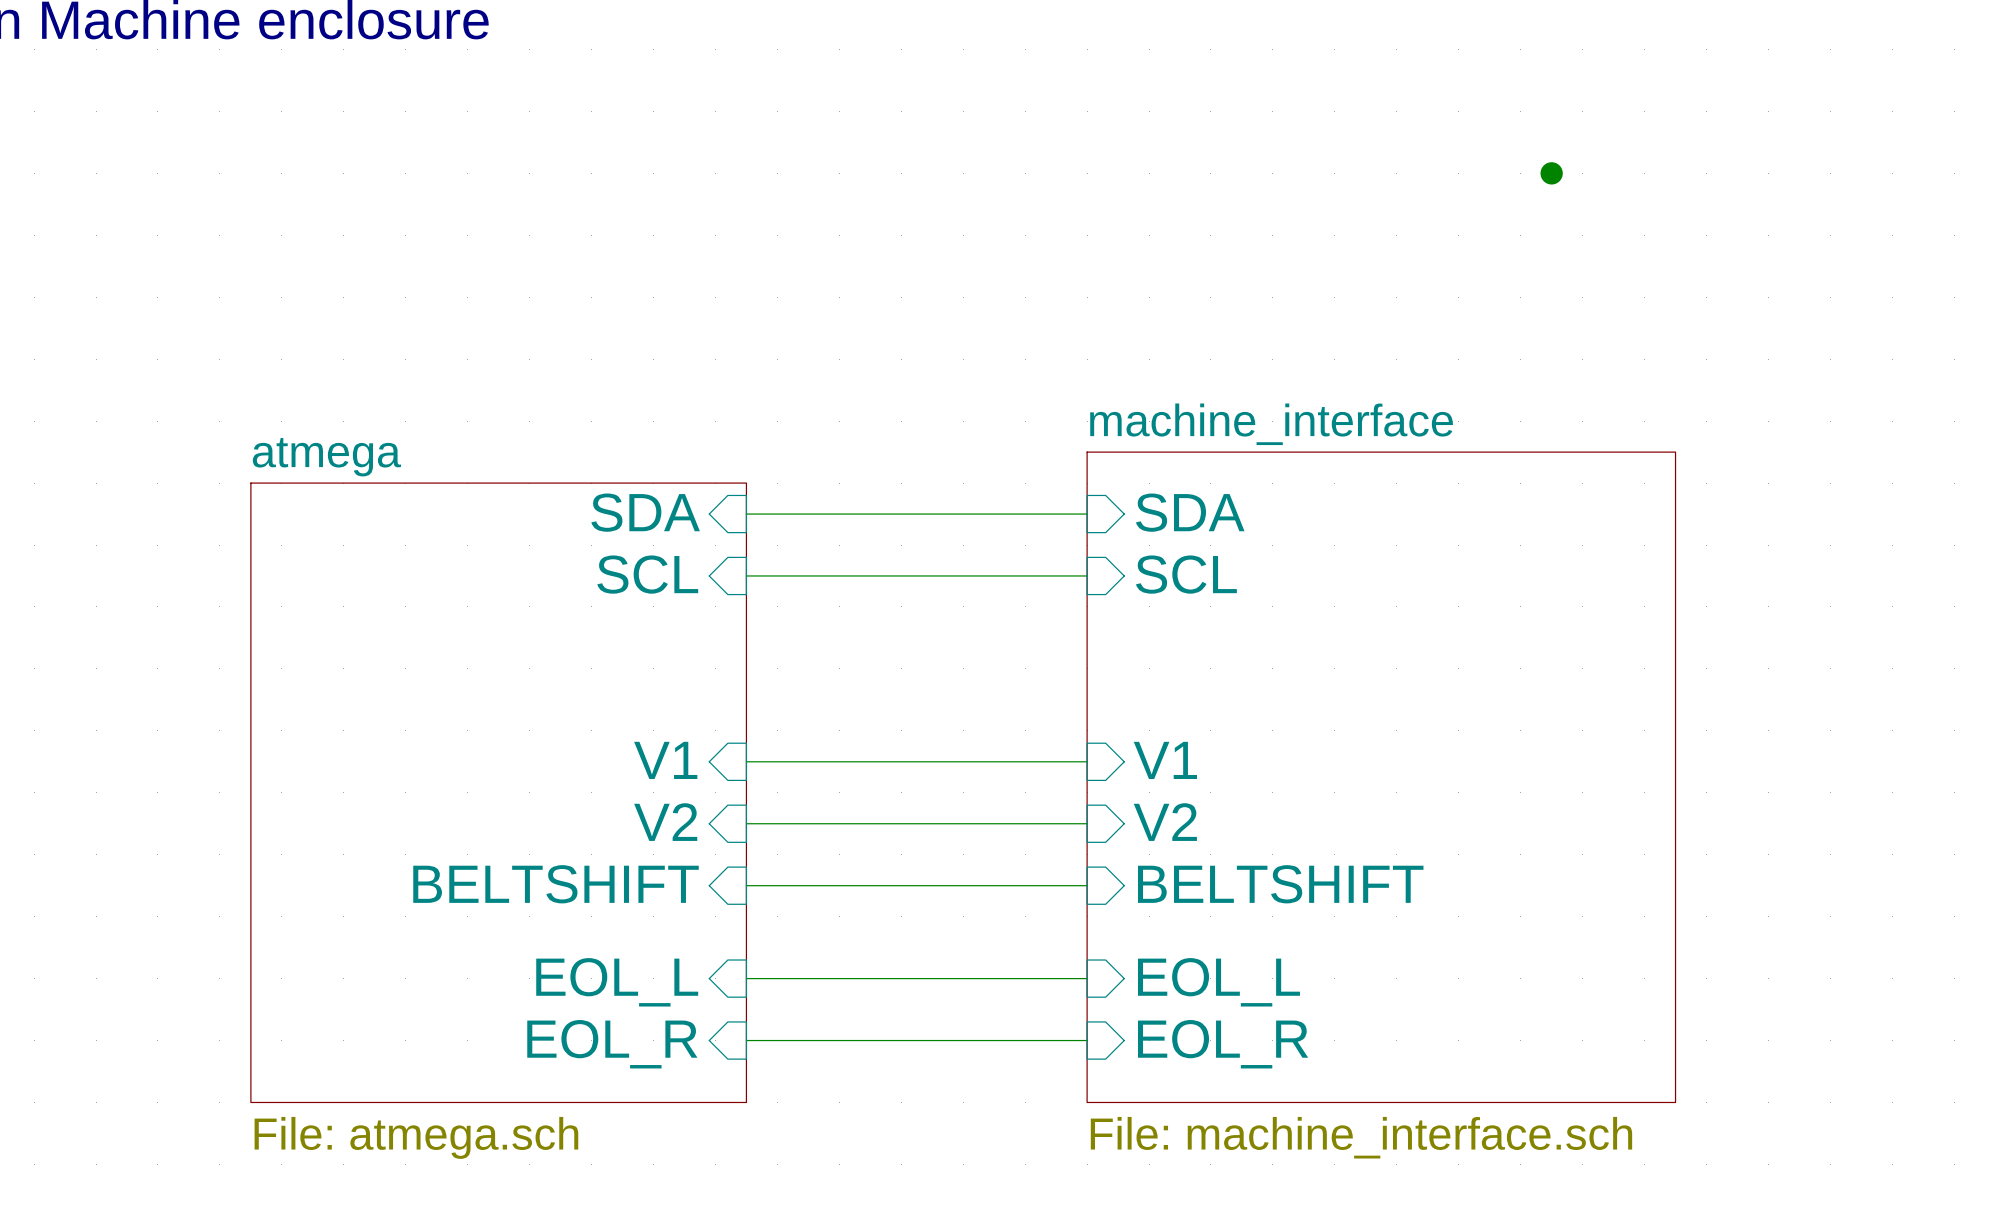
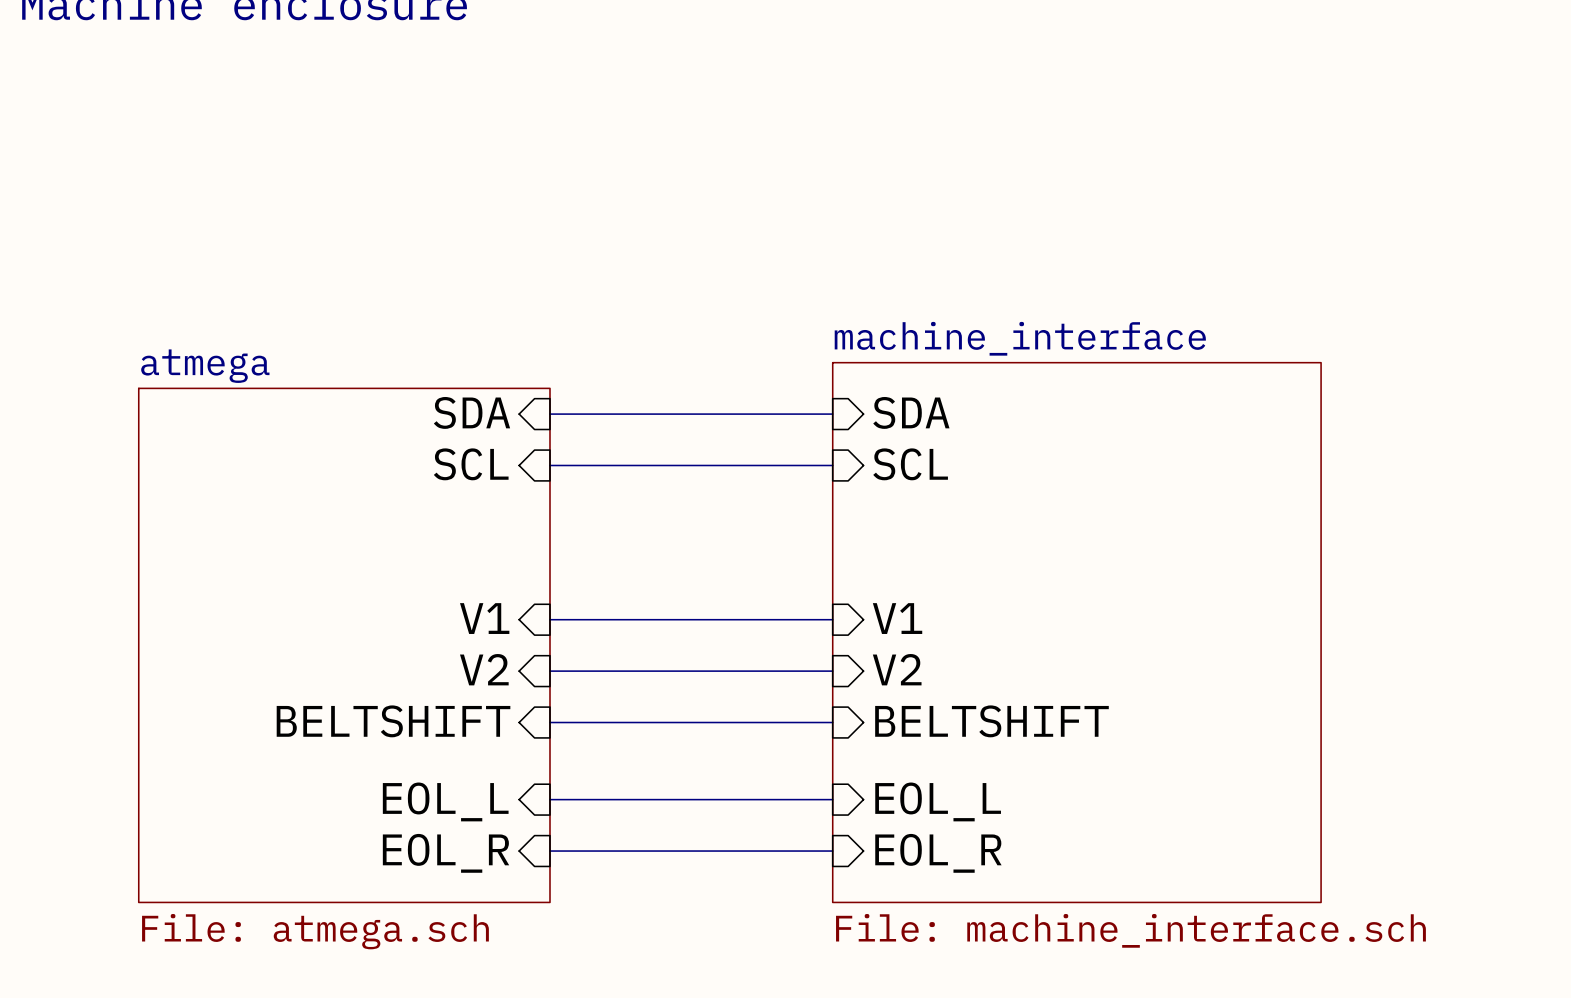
junction: (1551, 173) -> none

